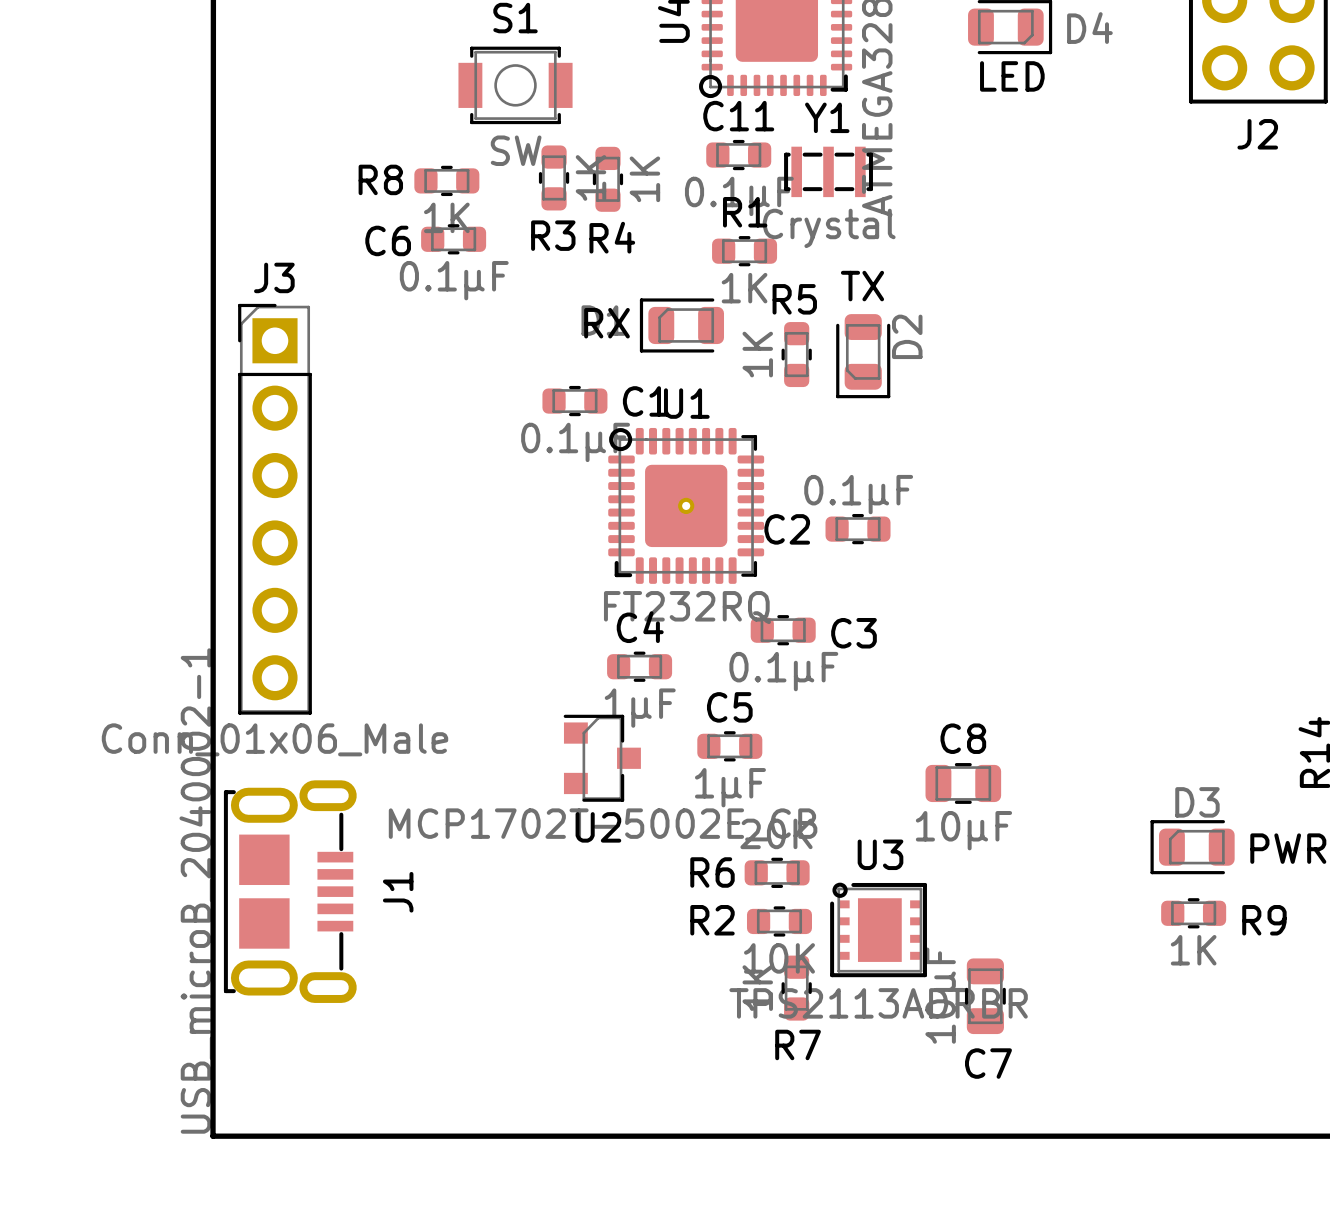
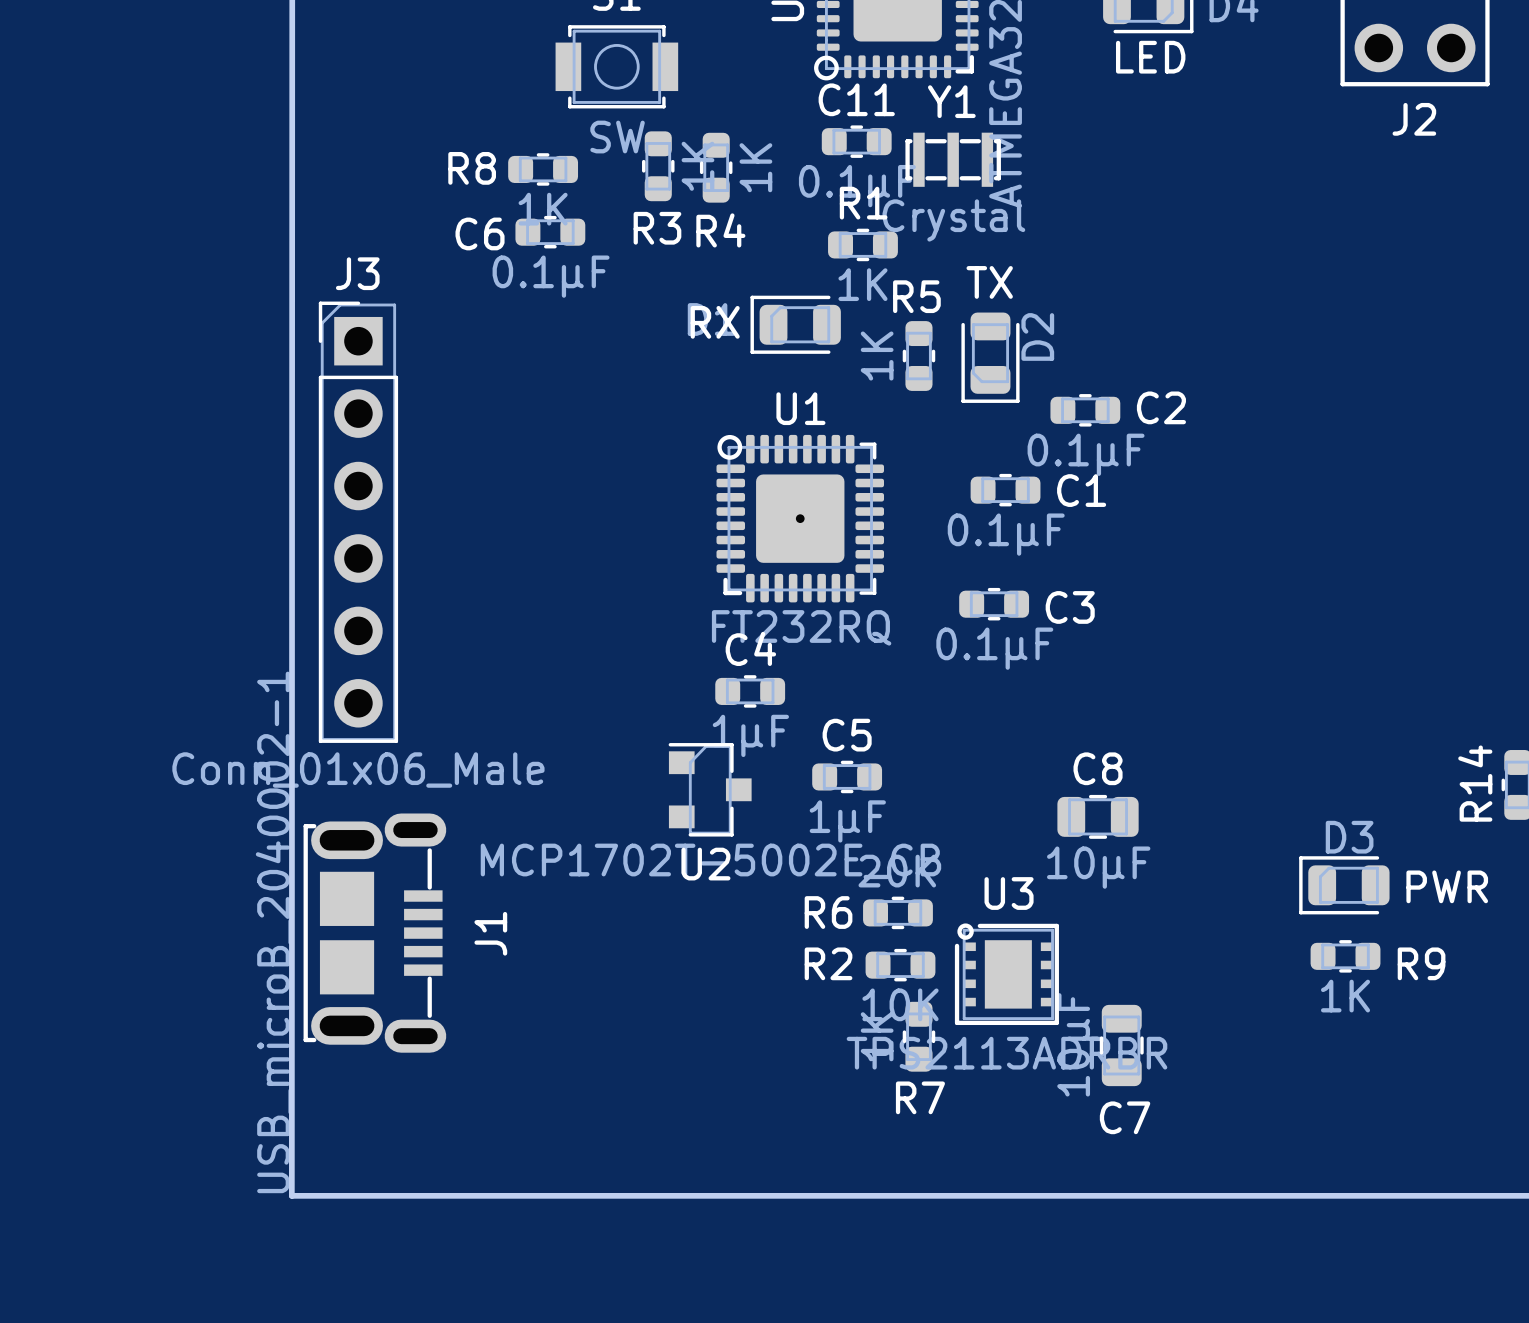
C1 position: (574, 401) -> (1005, 490)
C2 value position: 0.1µF (858, 494) -> 0.1µF (1086, 454)
C2 name position: C2 (787, 529) -> C2 (1161, 407)
C2 position: (858, 529) -> (1085, 410)
C3 position: (783, 630) -> (994, 604)

